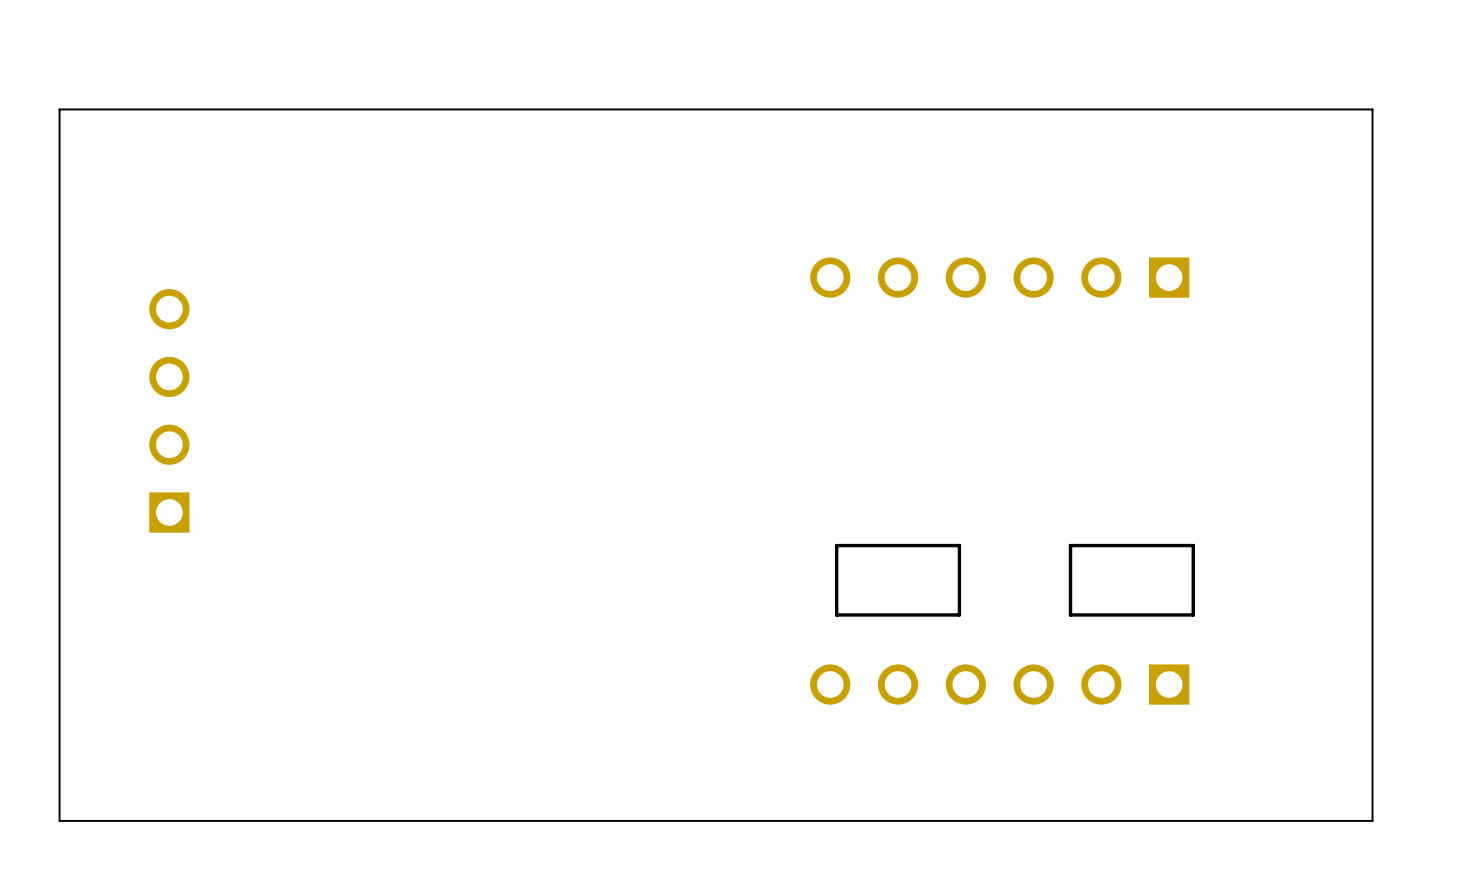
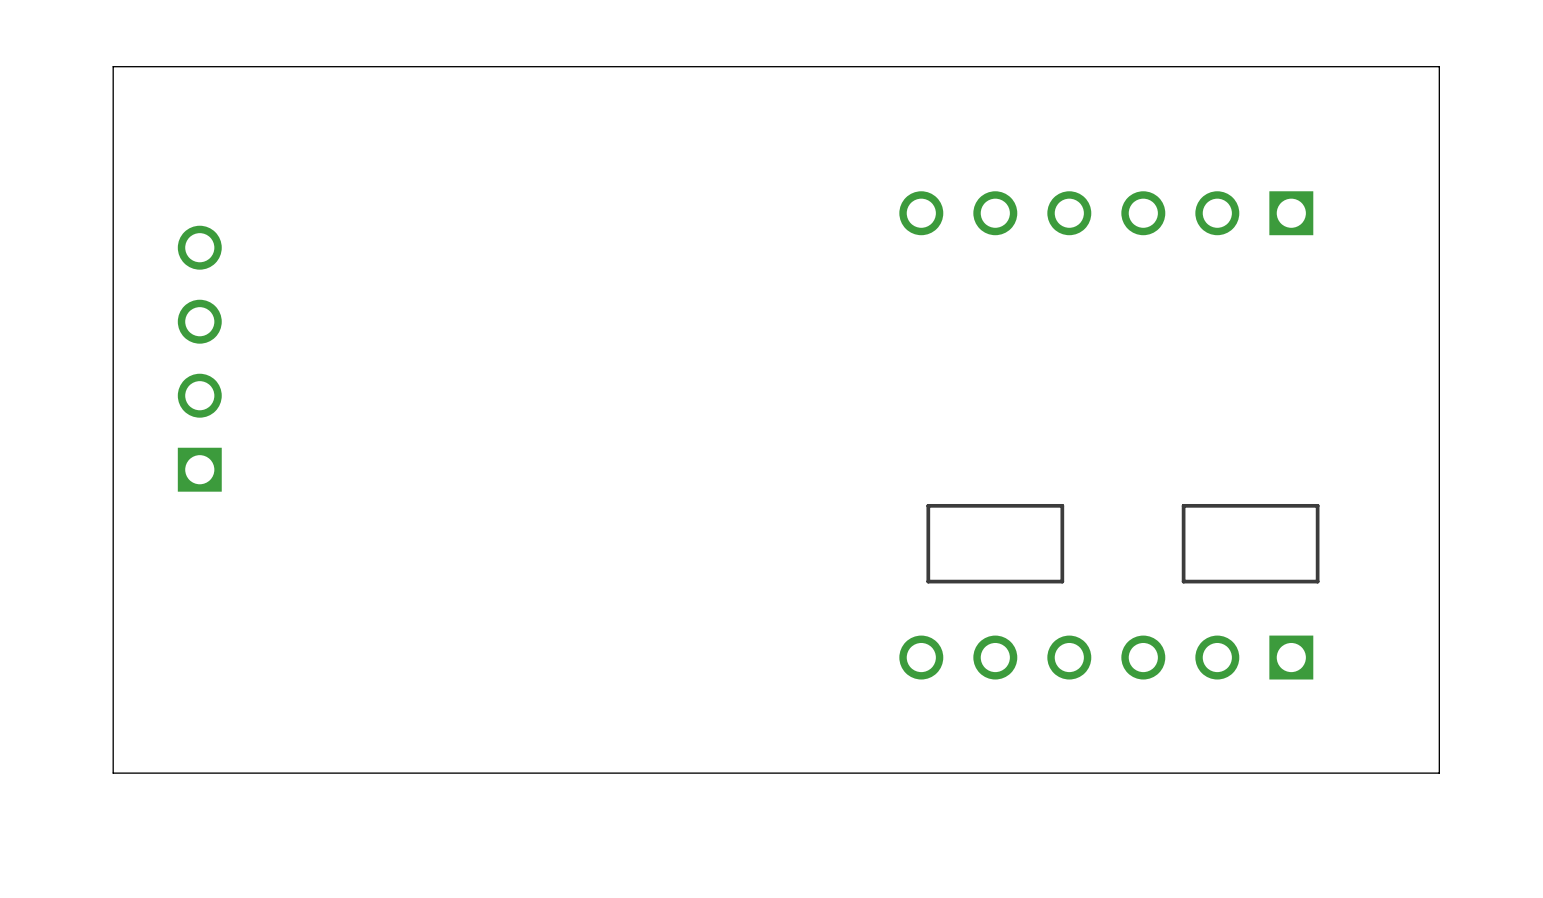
board edge: (1372, 109) (59, 109) (59, 820) (1372, 820) (1372, 109) -> (1439, 66) (1439, 773) (113, 773) (113, 66) (1439, 66)

